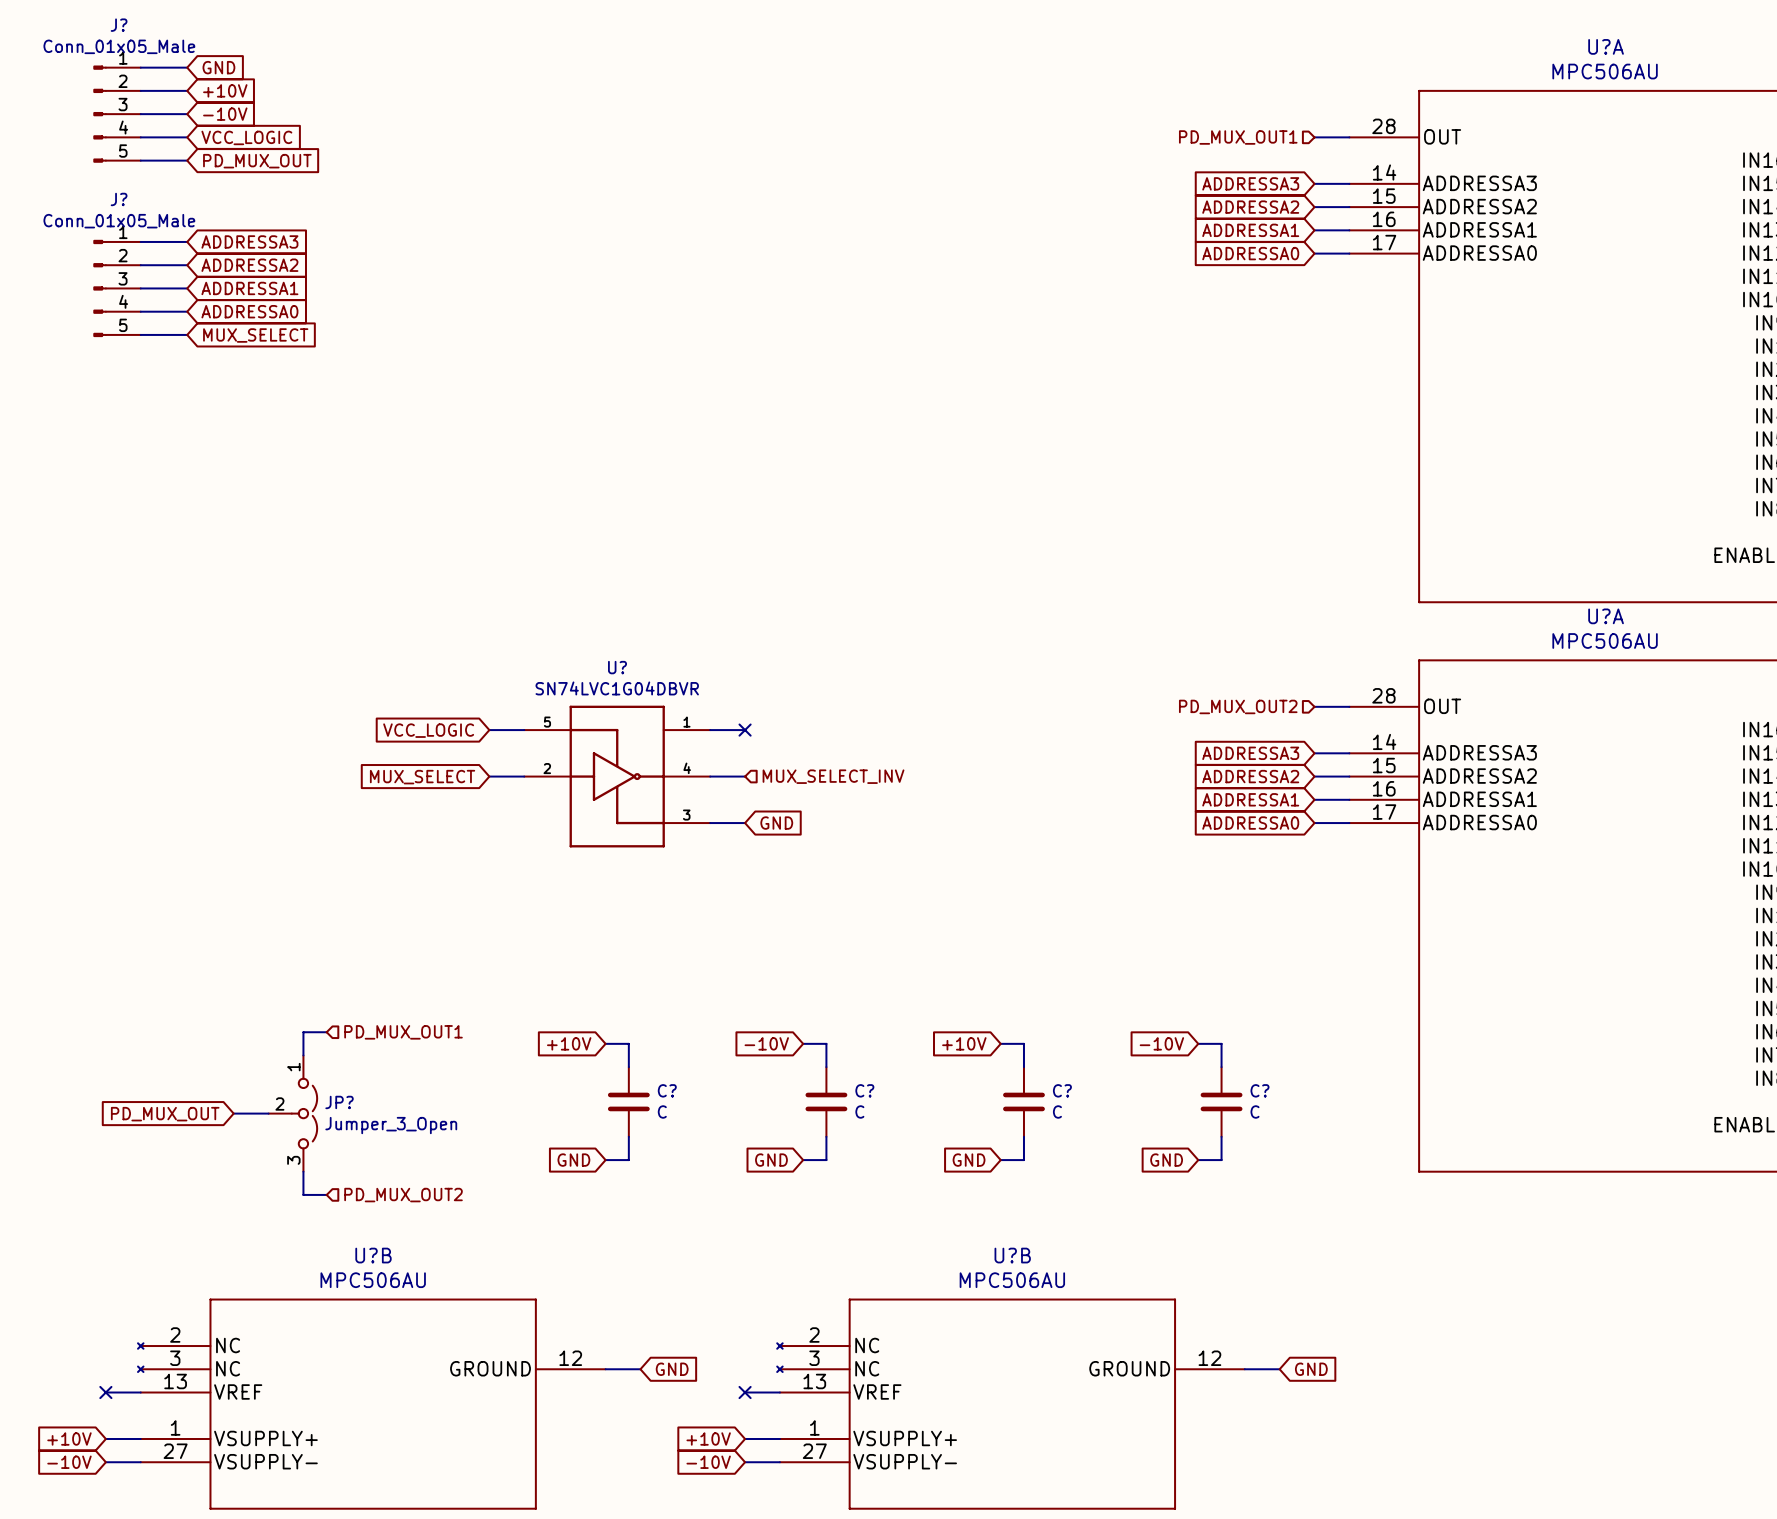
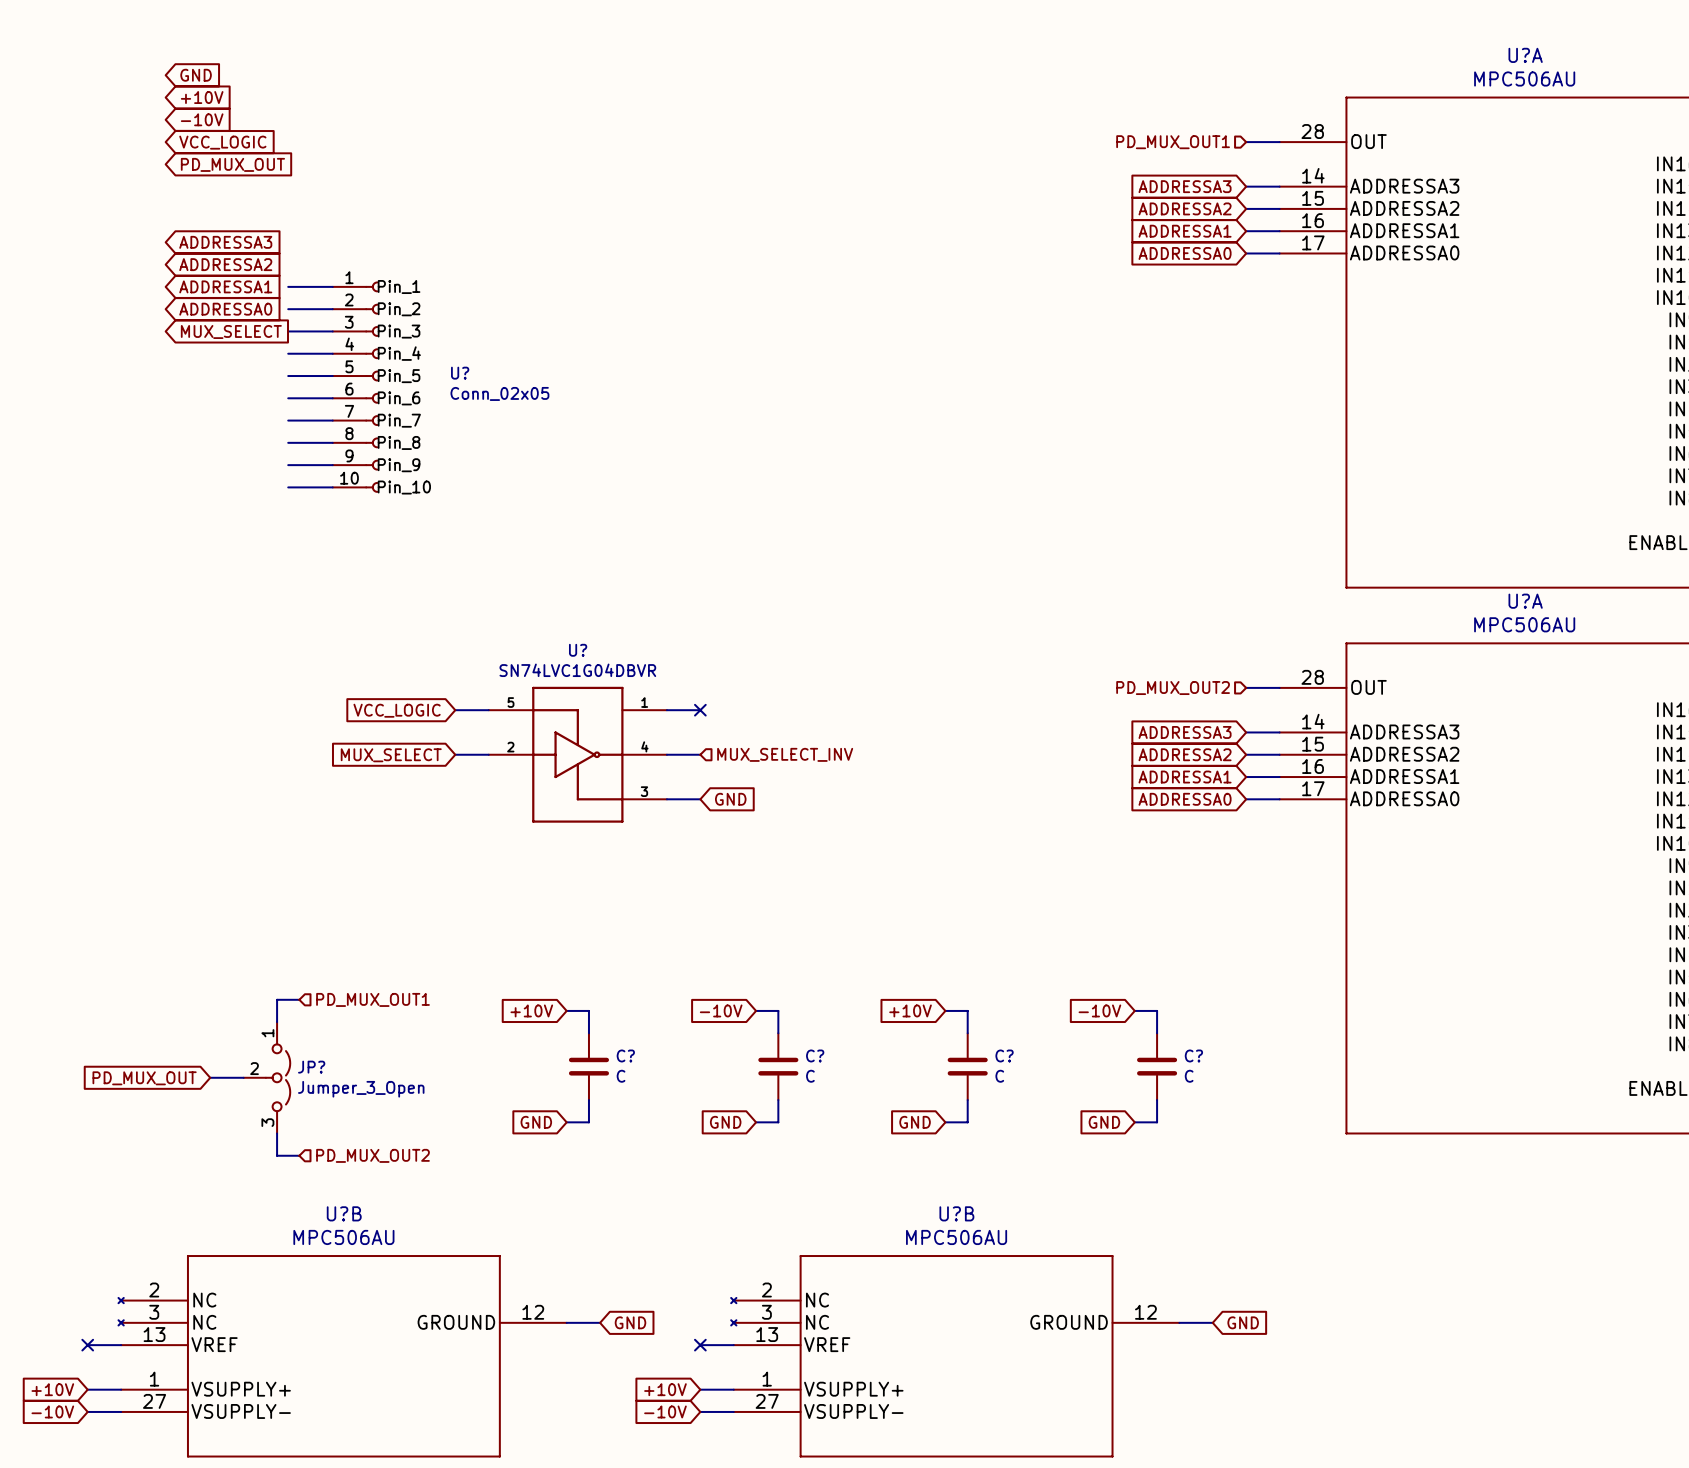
wire: (140, 67) (187, 67) -> none
wire: (140, 90) (187, 90) -> none
J?: Conn_01x05_Male (117, 114) -> none
wire: (140, 114) (187, 114) -> none
wire: (140, 137) (187, 137) -> none
wire: (140, 160) (187, 160) -> none
wire: (140, 241) (187, 241) -> (288, 286) (332, 286)
wire: (140, 265) (187, 265) -> (288, 309) (332, 309)
J?: Conn_01x05_Male (117, 288) -> none
wire: (140, 288) (187, 288) -> (288, 331) (332, 331)
wire: (140, 311) (187, 311) -> (288, 353) (332, 353)
wire: (140, 334) (187, 334) -> (288, 376) (332, 376)
U?: none -> Conn_02x05 (355, 387)
wire: none -> (288, 398) (332, 398)
wire: none -> (288, 420) (332, 420)
wire: none -> (288, 442) (332, 442)
wire: none -> (288, 465) (332, 465)
wire: none -> (288, 487) (332, 487)

